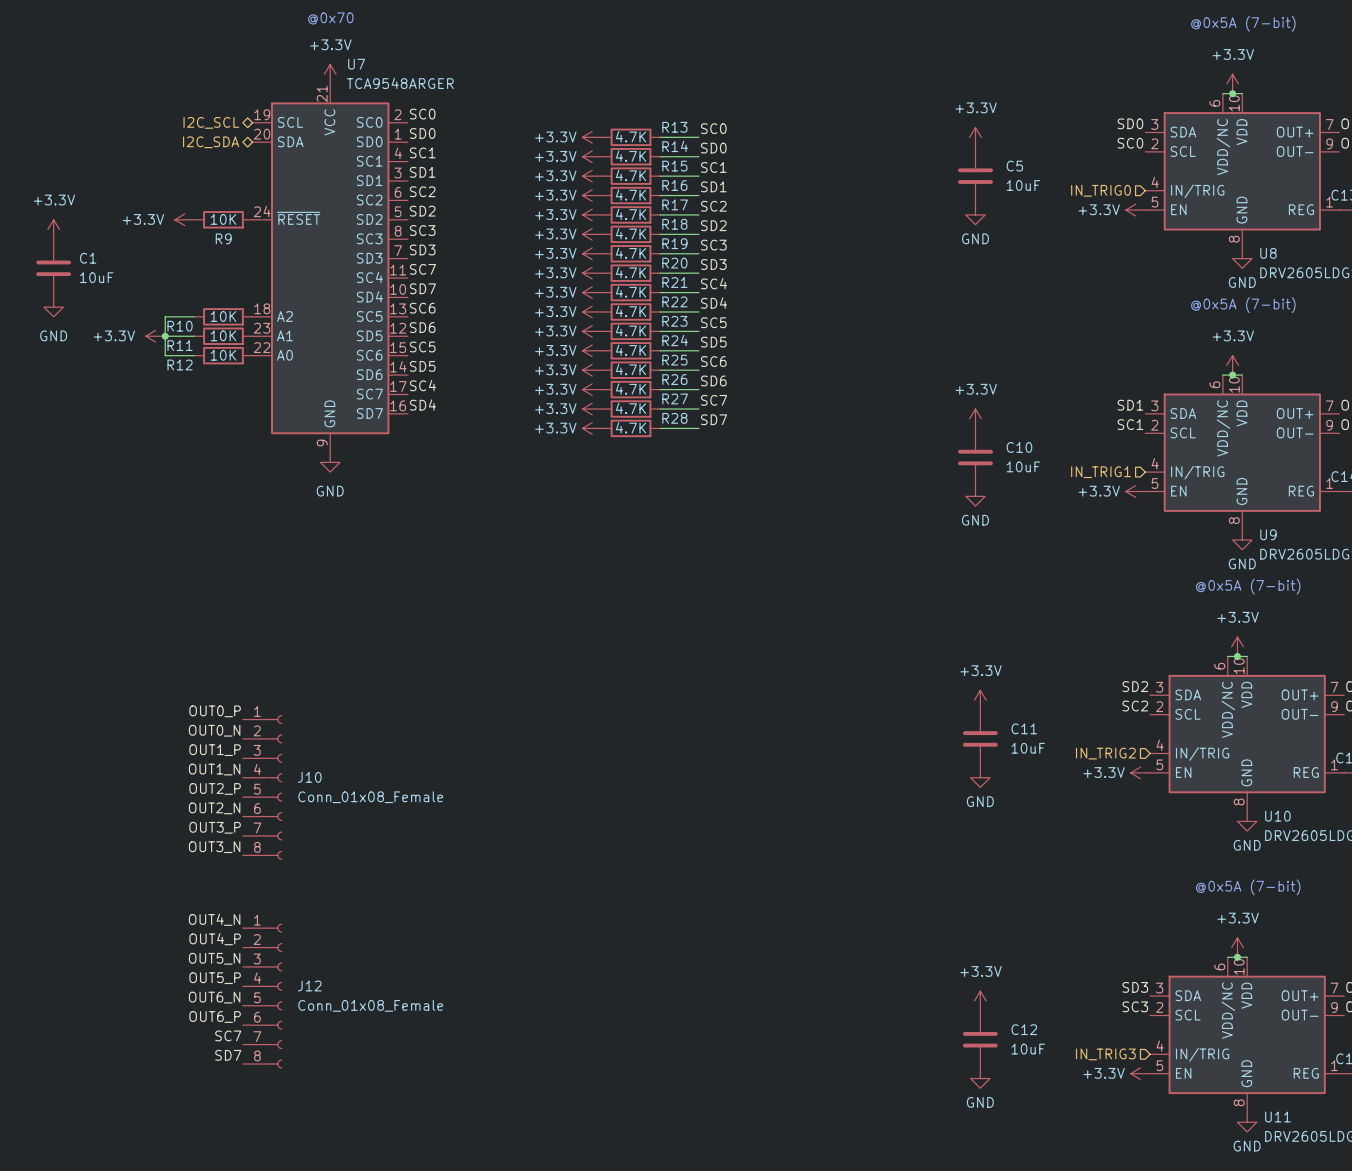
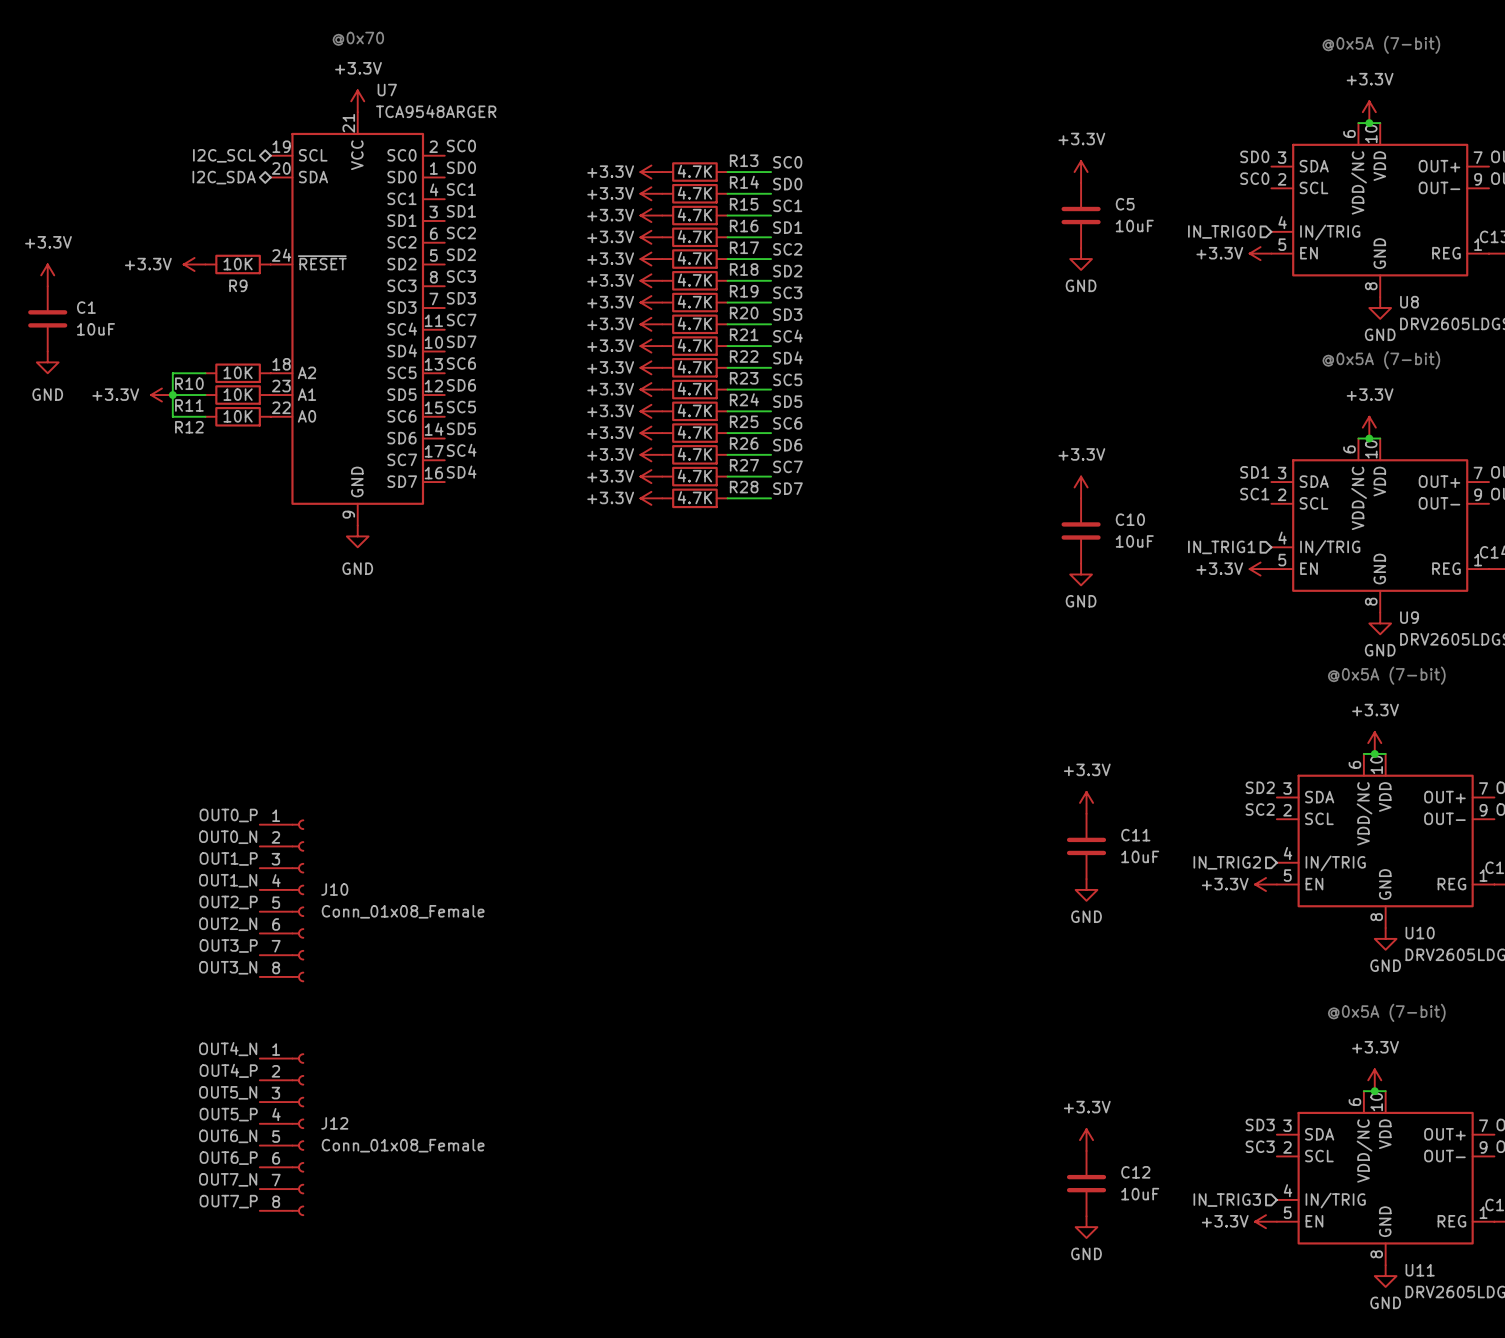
label: SC7 (228, 1035) -> OUT7_N (228, 1179)
label: SD7 (228, 1055) -> OUT7_P (228, 1201)

